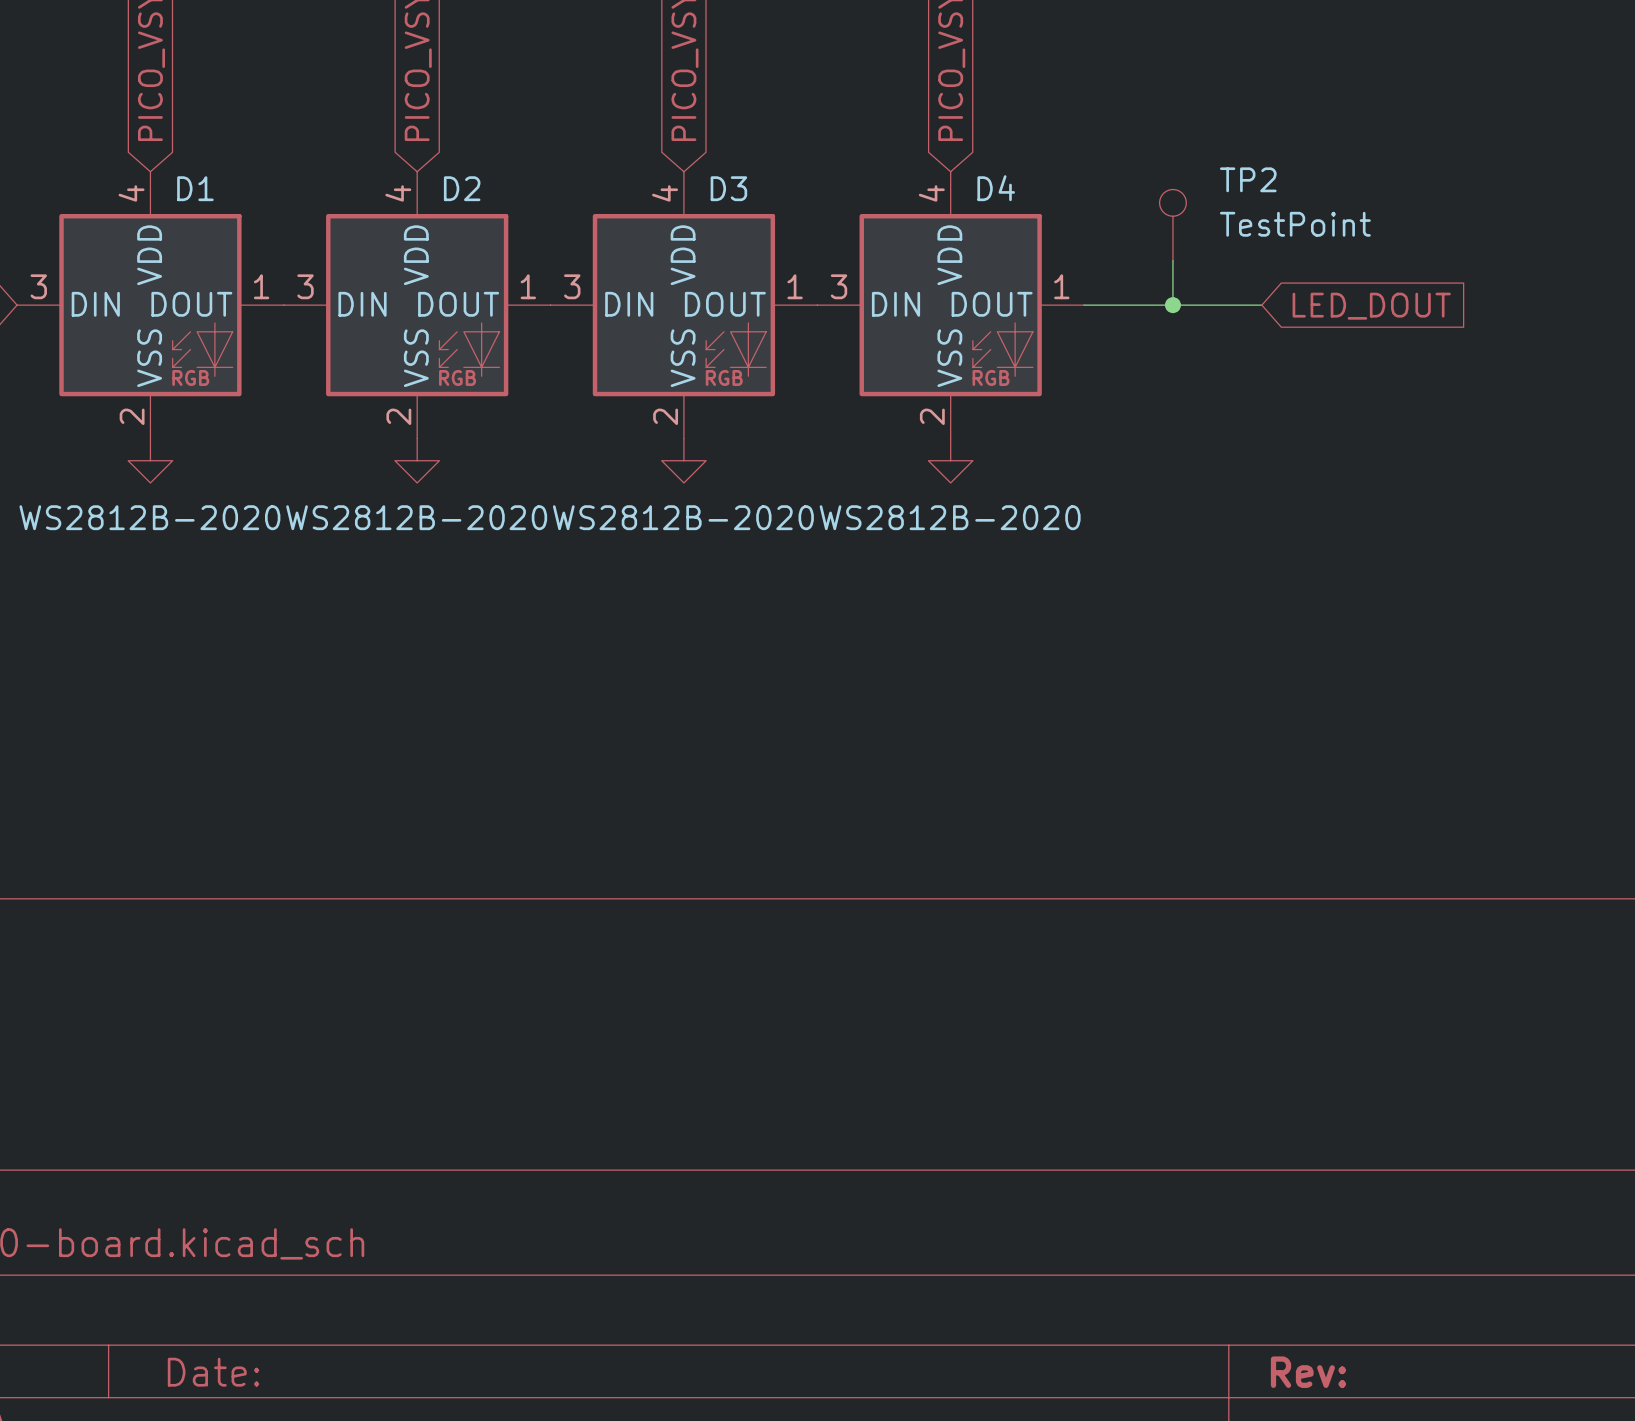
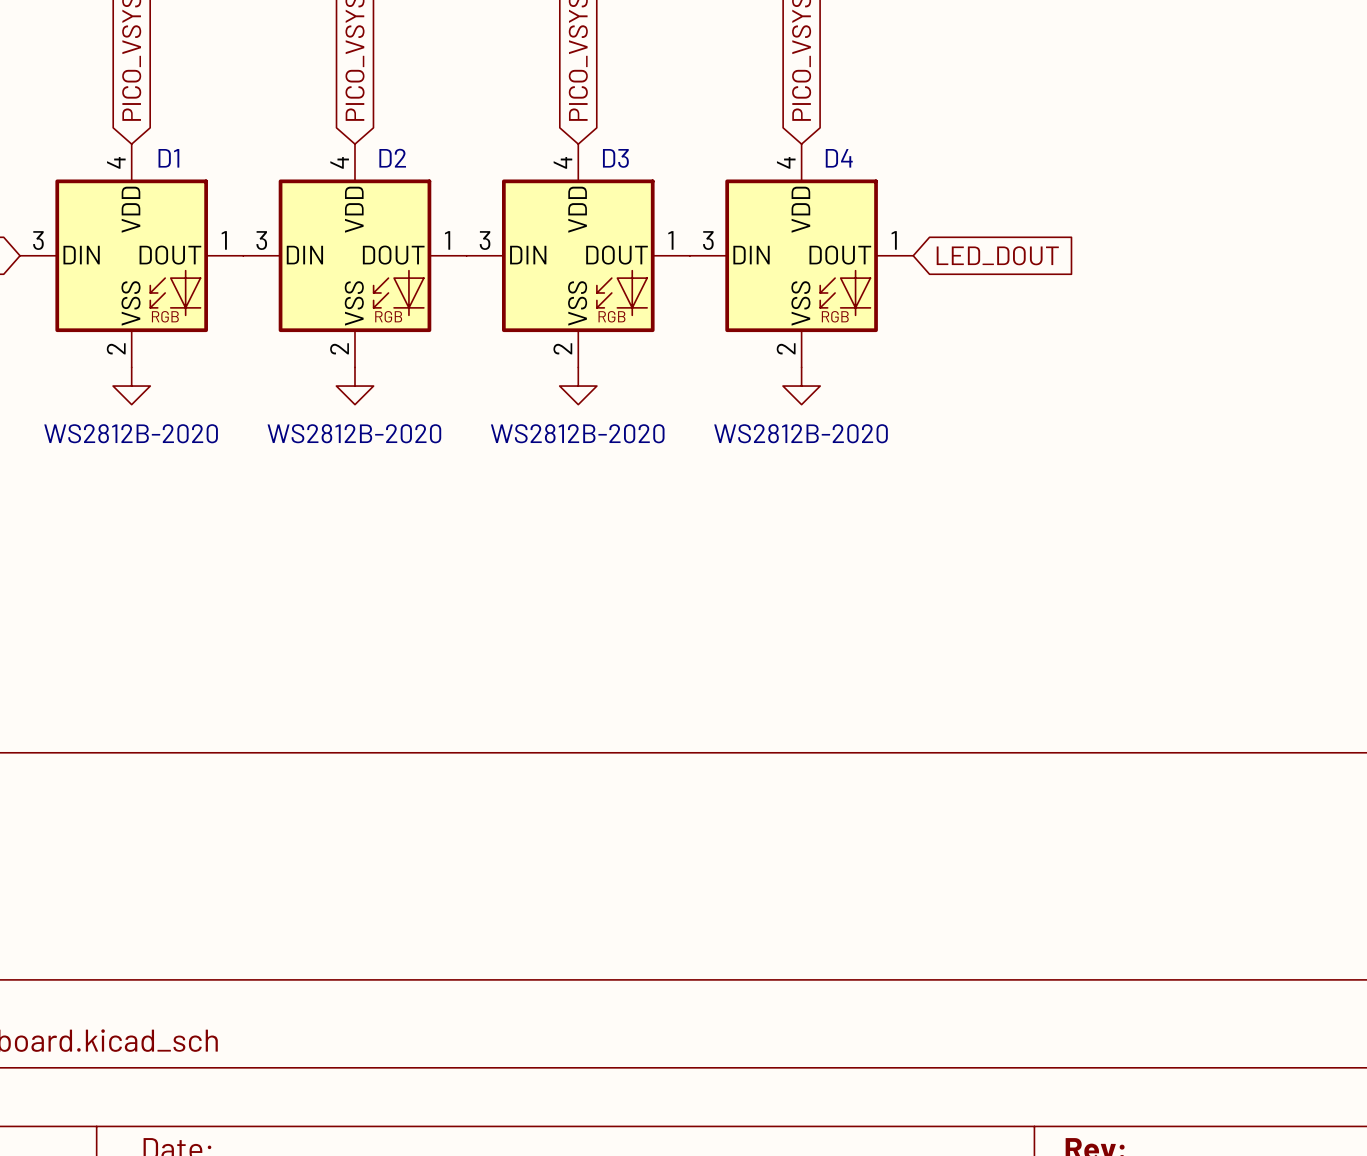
TP2: TestPoint (1172, 225) -> none
wire: (1172, 260) (1172, 305) -> none
wire: (1084, 305) (1261, 305) -> none
junction: (1172, 305) -> none
global label position: LED_DOUT (1371, 306) -> LED_DOUT (997, 255)

